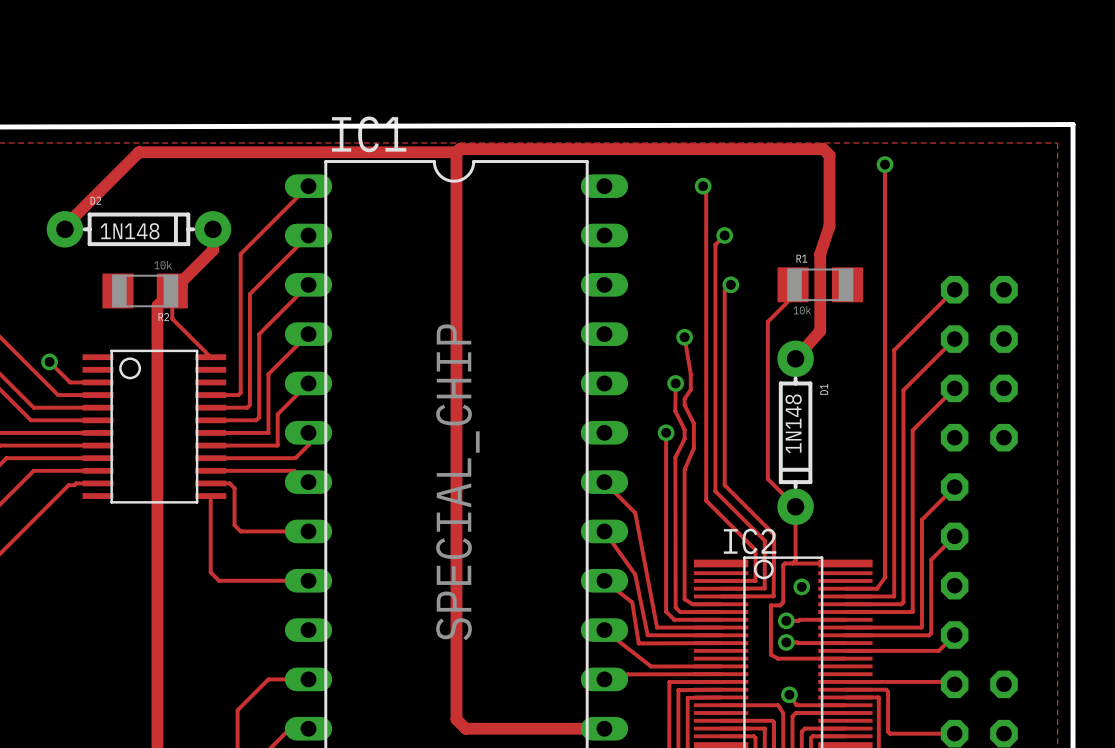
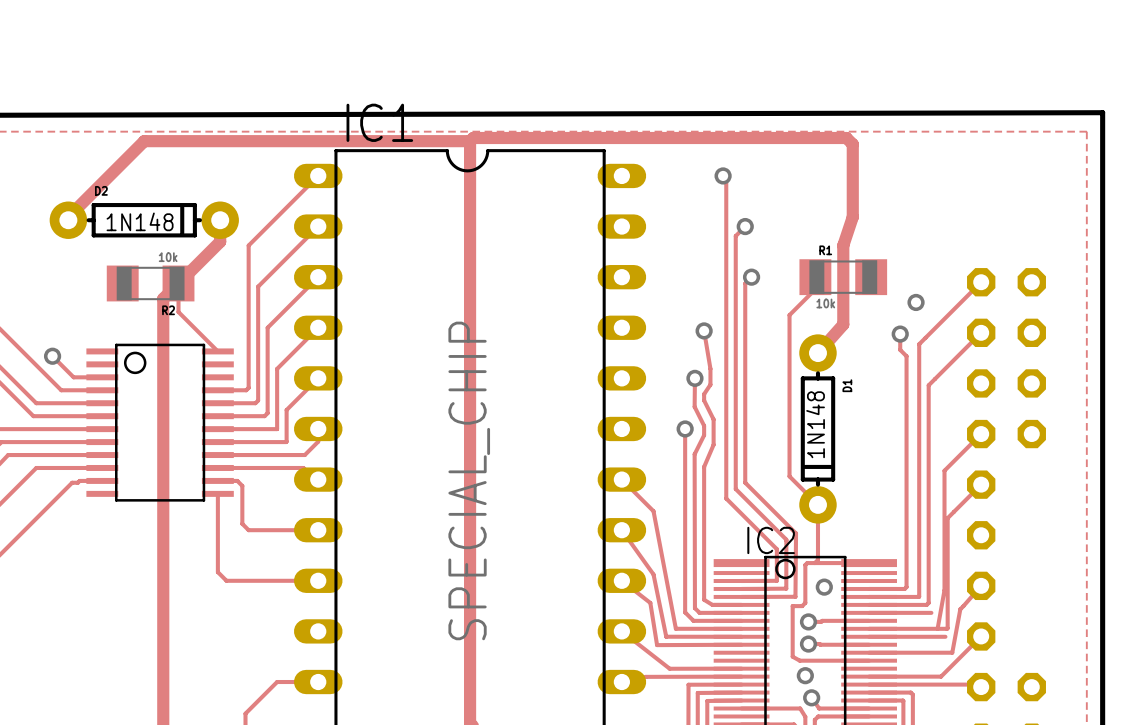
track: (884, 164) (884, 577) (877, 588) -> (900, 334) (900, 349) (906, 356) (906, 587) (901, 588)
via: (884, 164) -> none
via: none -> (916, 302)
via: none -> (900, 334)
track: (954, 388) (912, 430) (912, 611) (906, 612) -> none
track: none -> (981, 434) (944, 470) (944, 590) (937, 628)
track: (954, 536) (931, 559) (931, 633) (929, 635) (919, 635) -> none
track: (926, 650) (938, 650) -> (952, 652) (960, 609) (981, 585)
track: none -> (964, 652) (941, 676) (869, 676)
via: none -> (805, 675)

